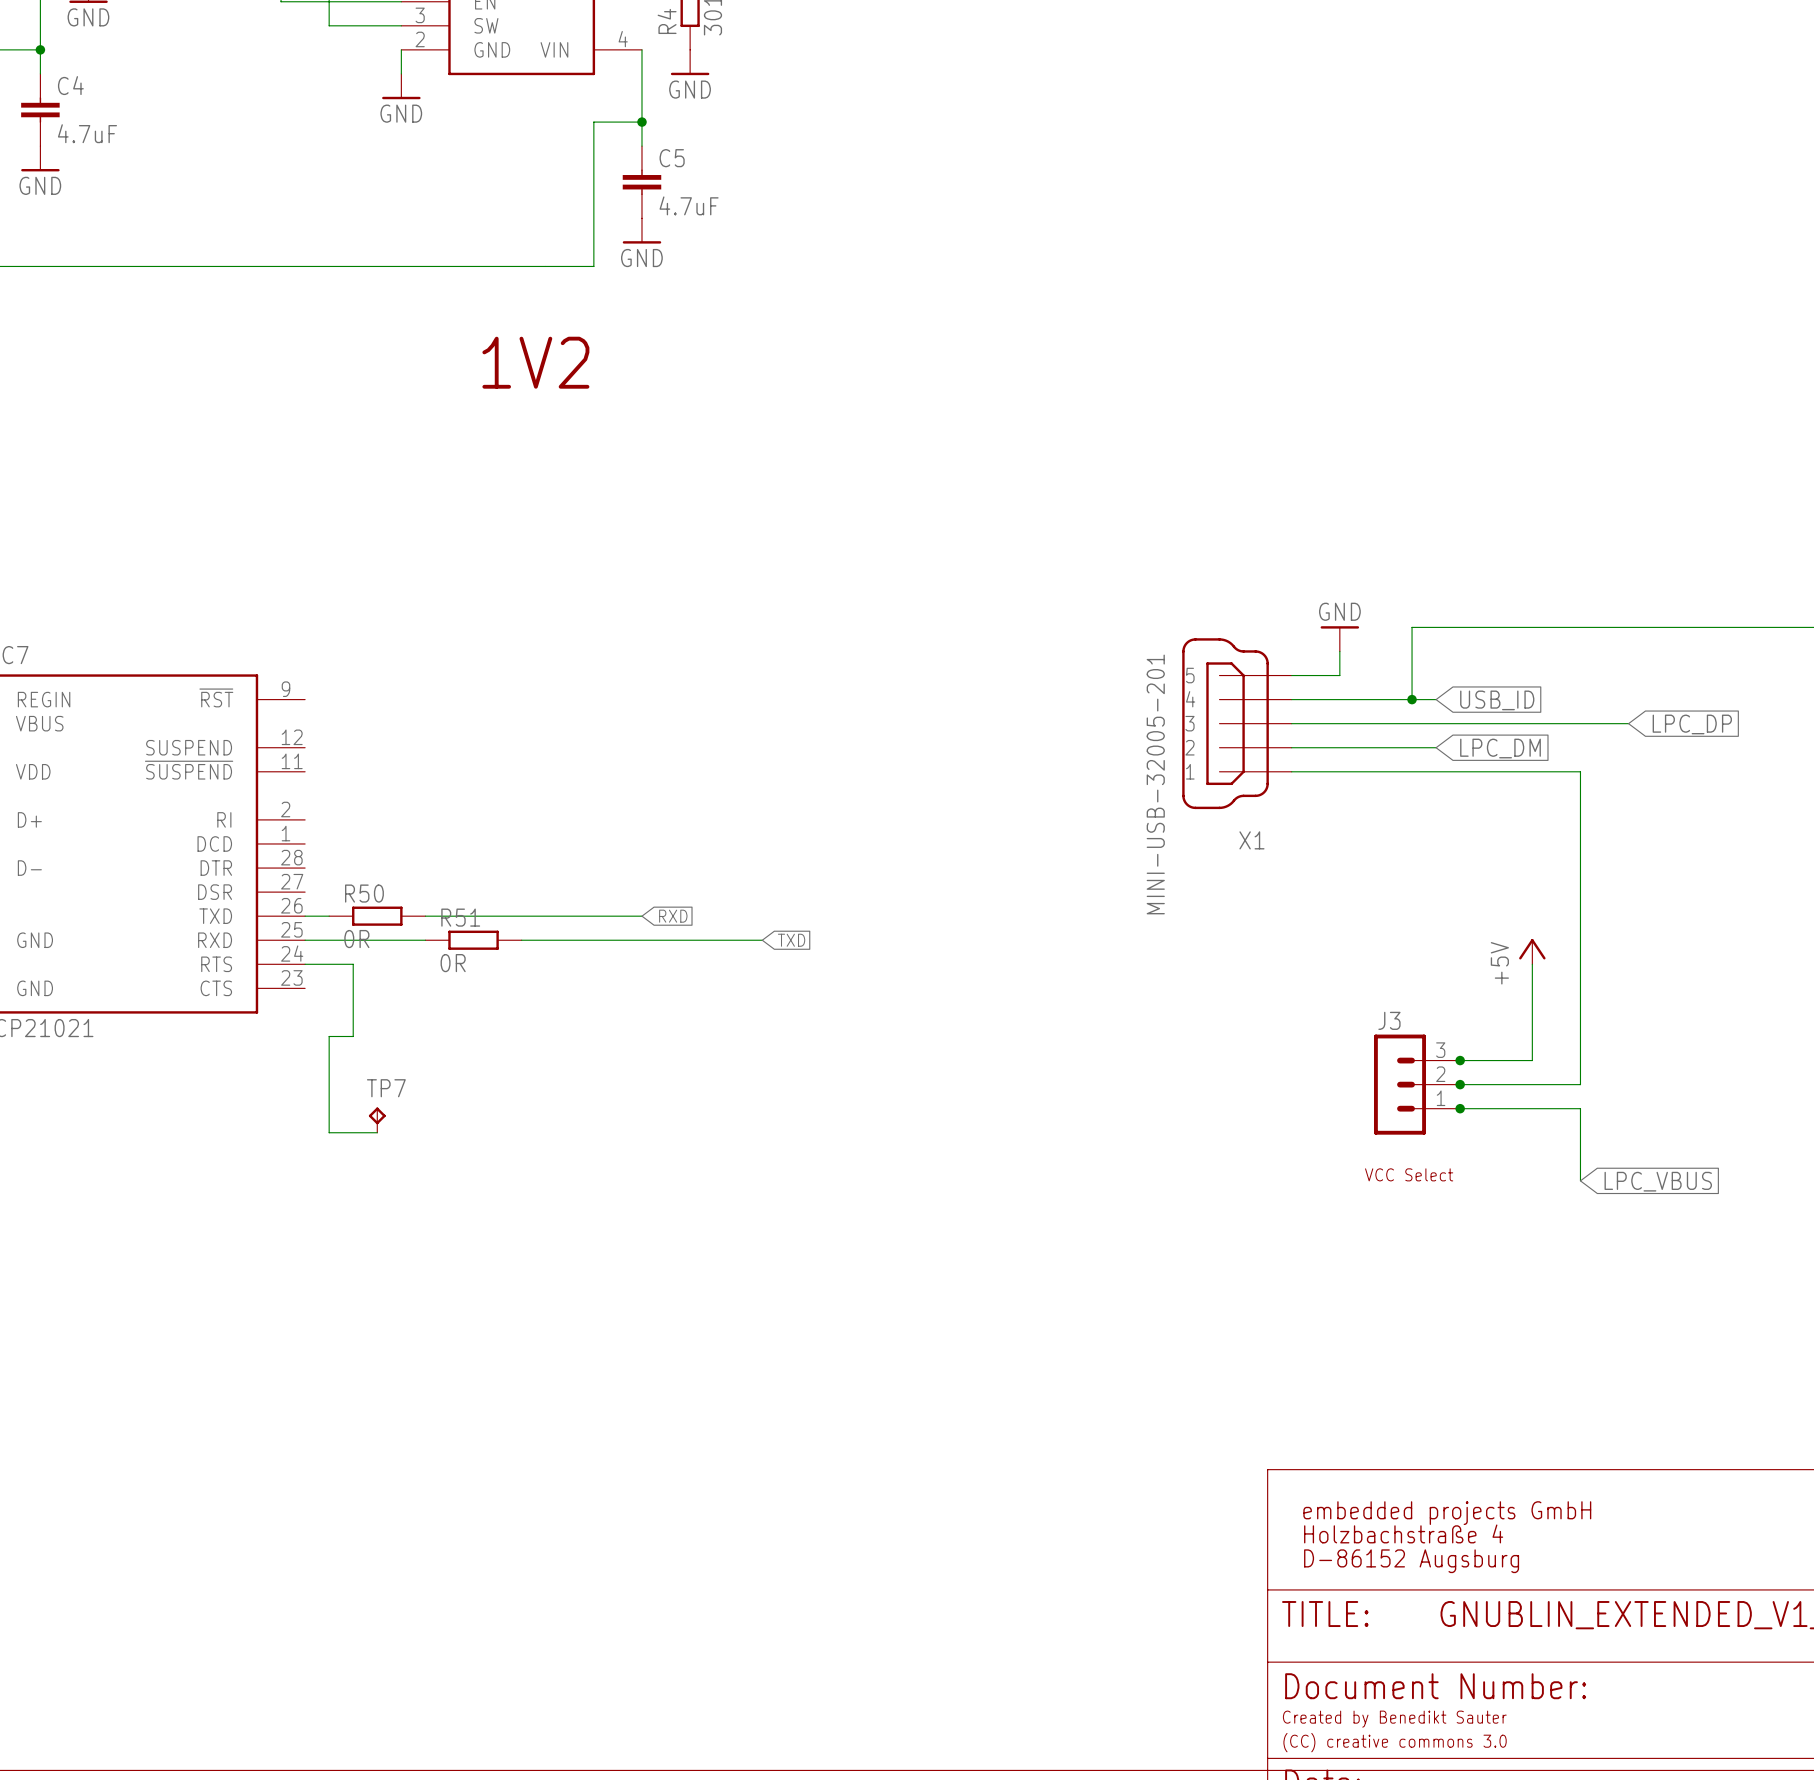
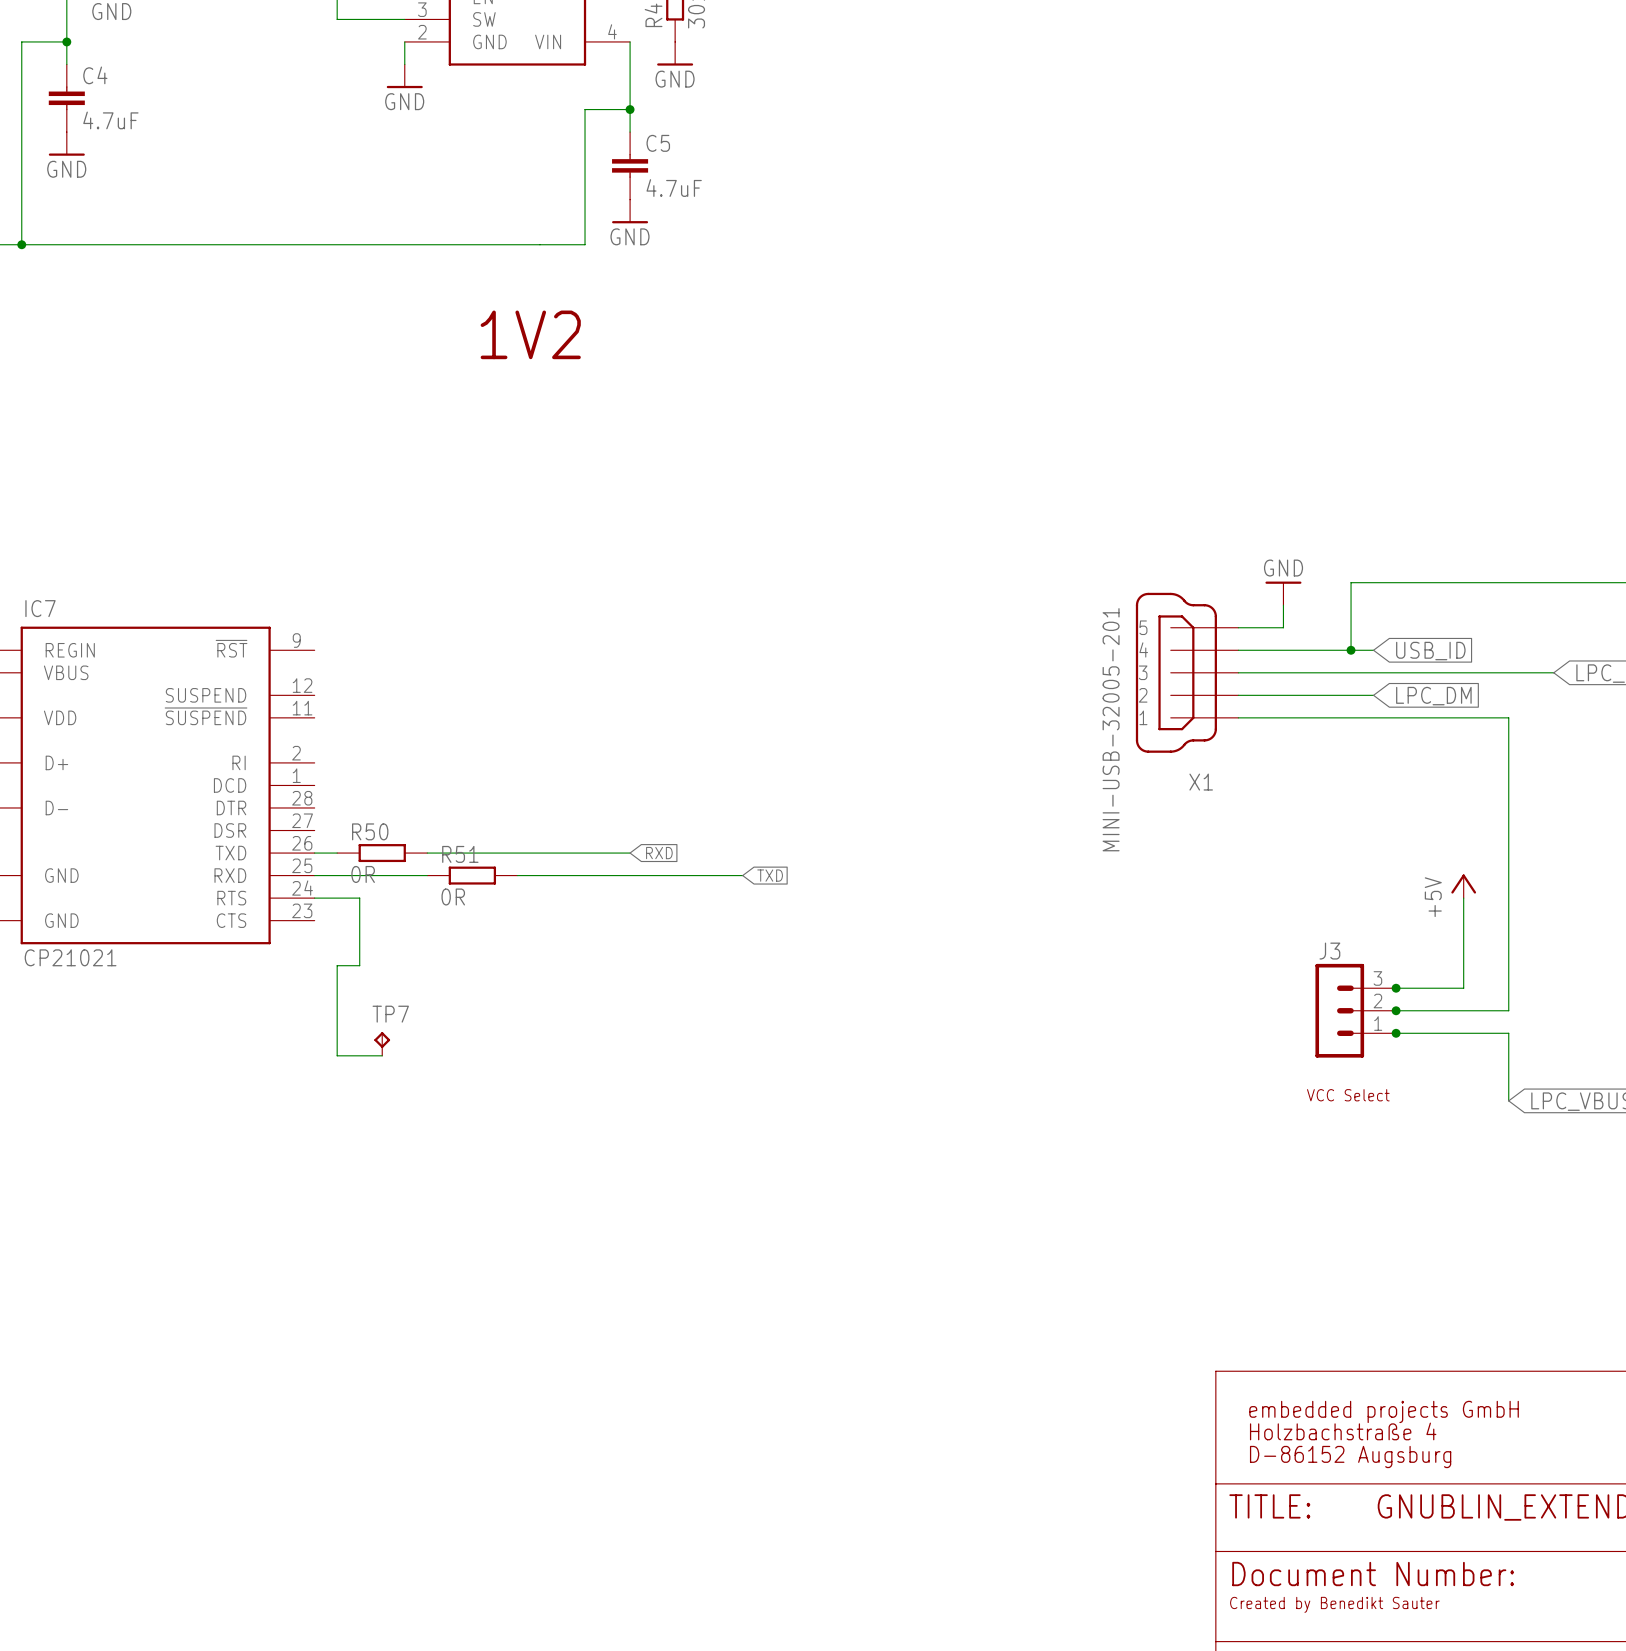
text: (CC) creative commons 3.0 (1395, 1742) -> none

